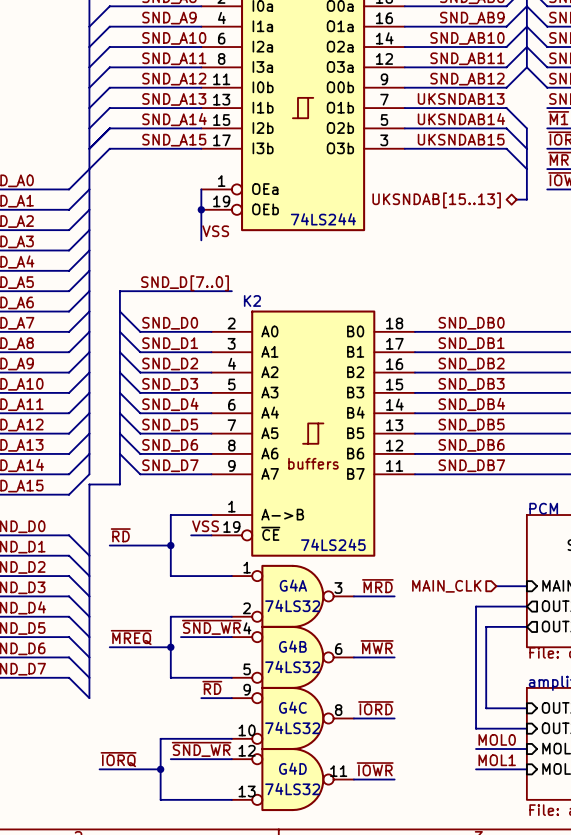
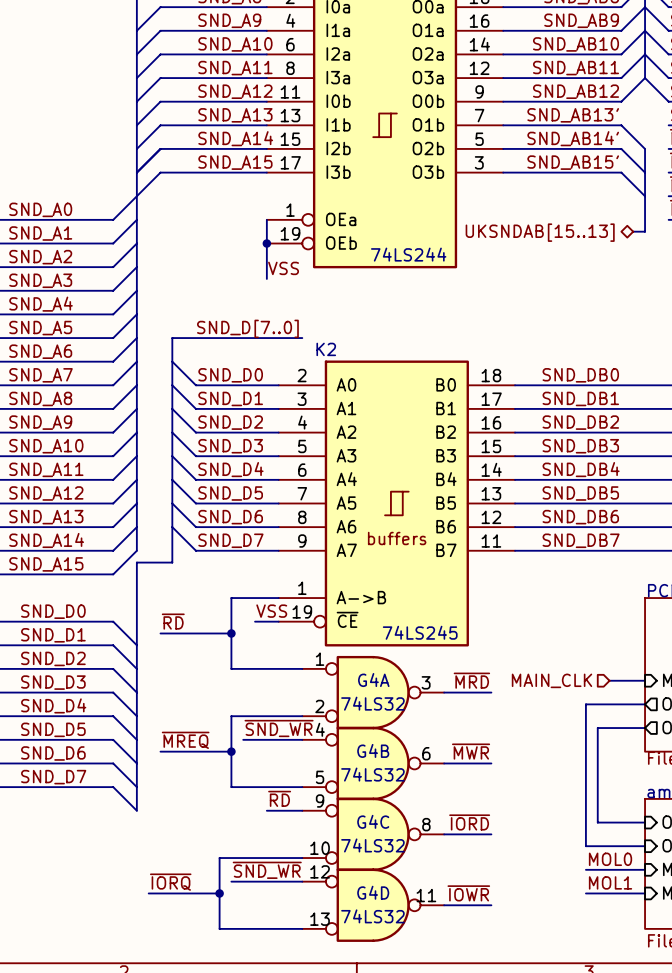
label: UKSNDAB13 (461, 98) -> SND_AB13' (573, 115)
label: UKSNDAB14 (461, 119) -> SND_AB14' (573, 138)
label: UKSNDAB15 (461, 139) -> SND_AB15' (573, 162)

